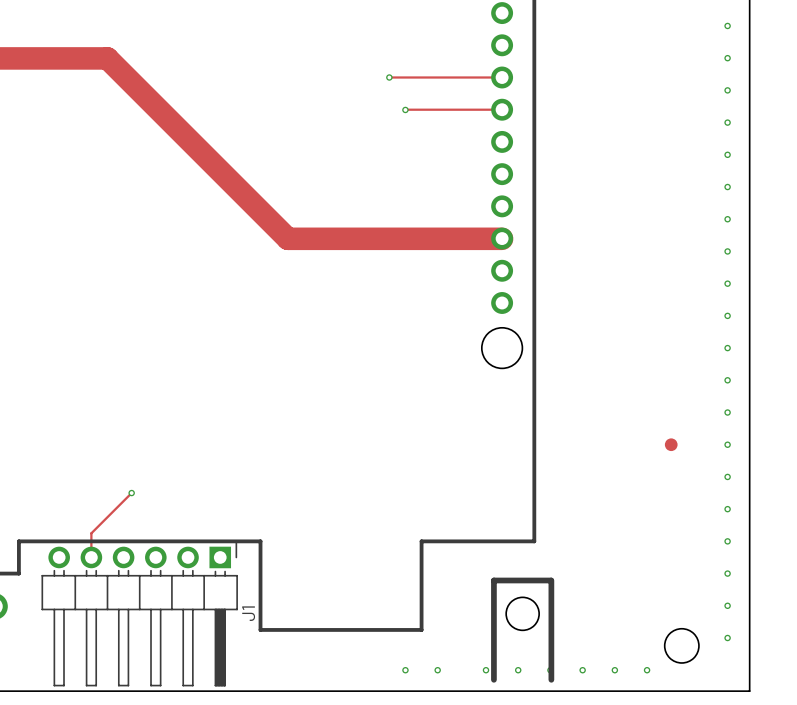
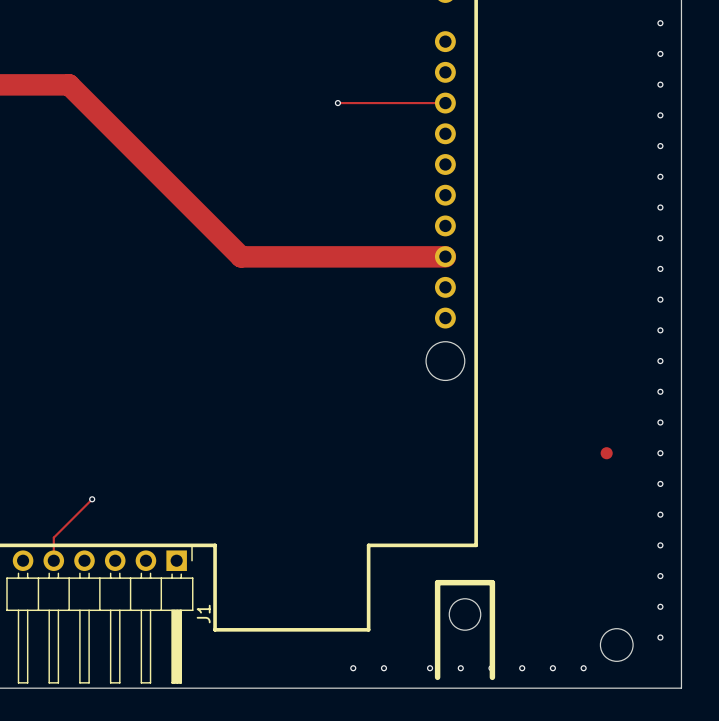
via: (405, 109) -> none
track: (502, 109) (405, 109) -> none

